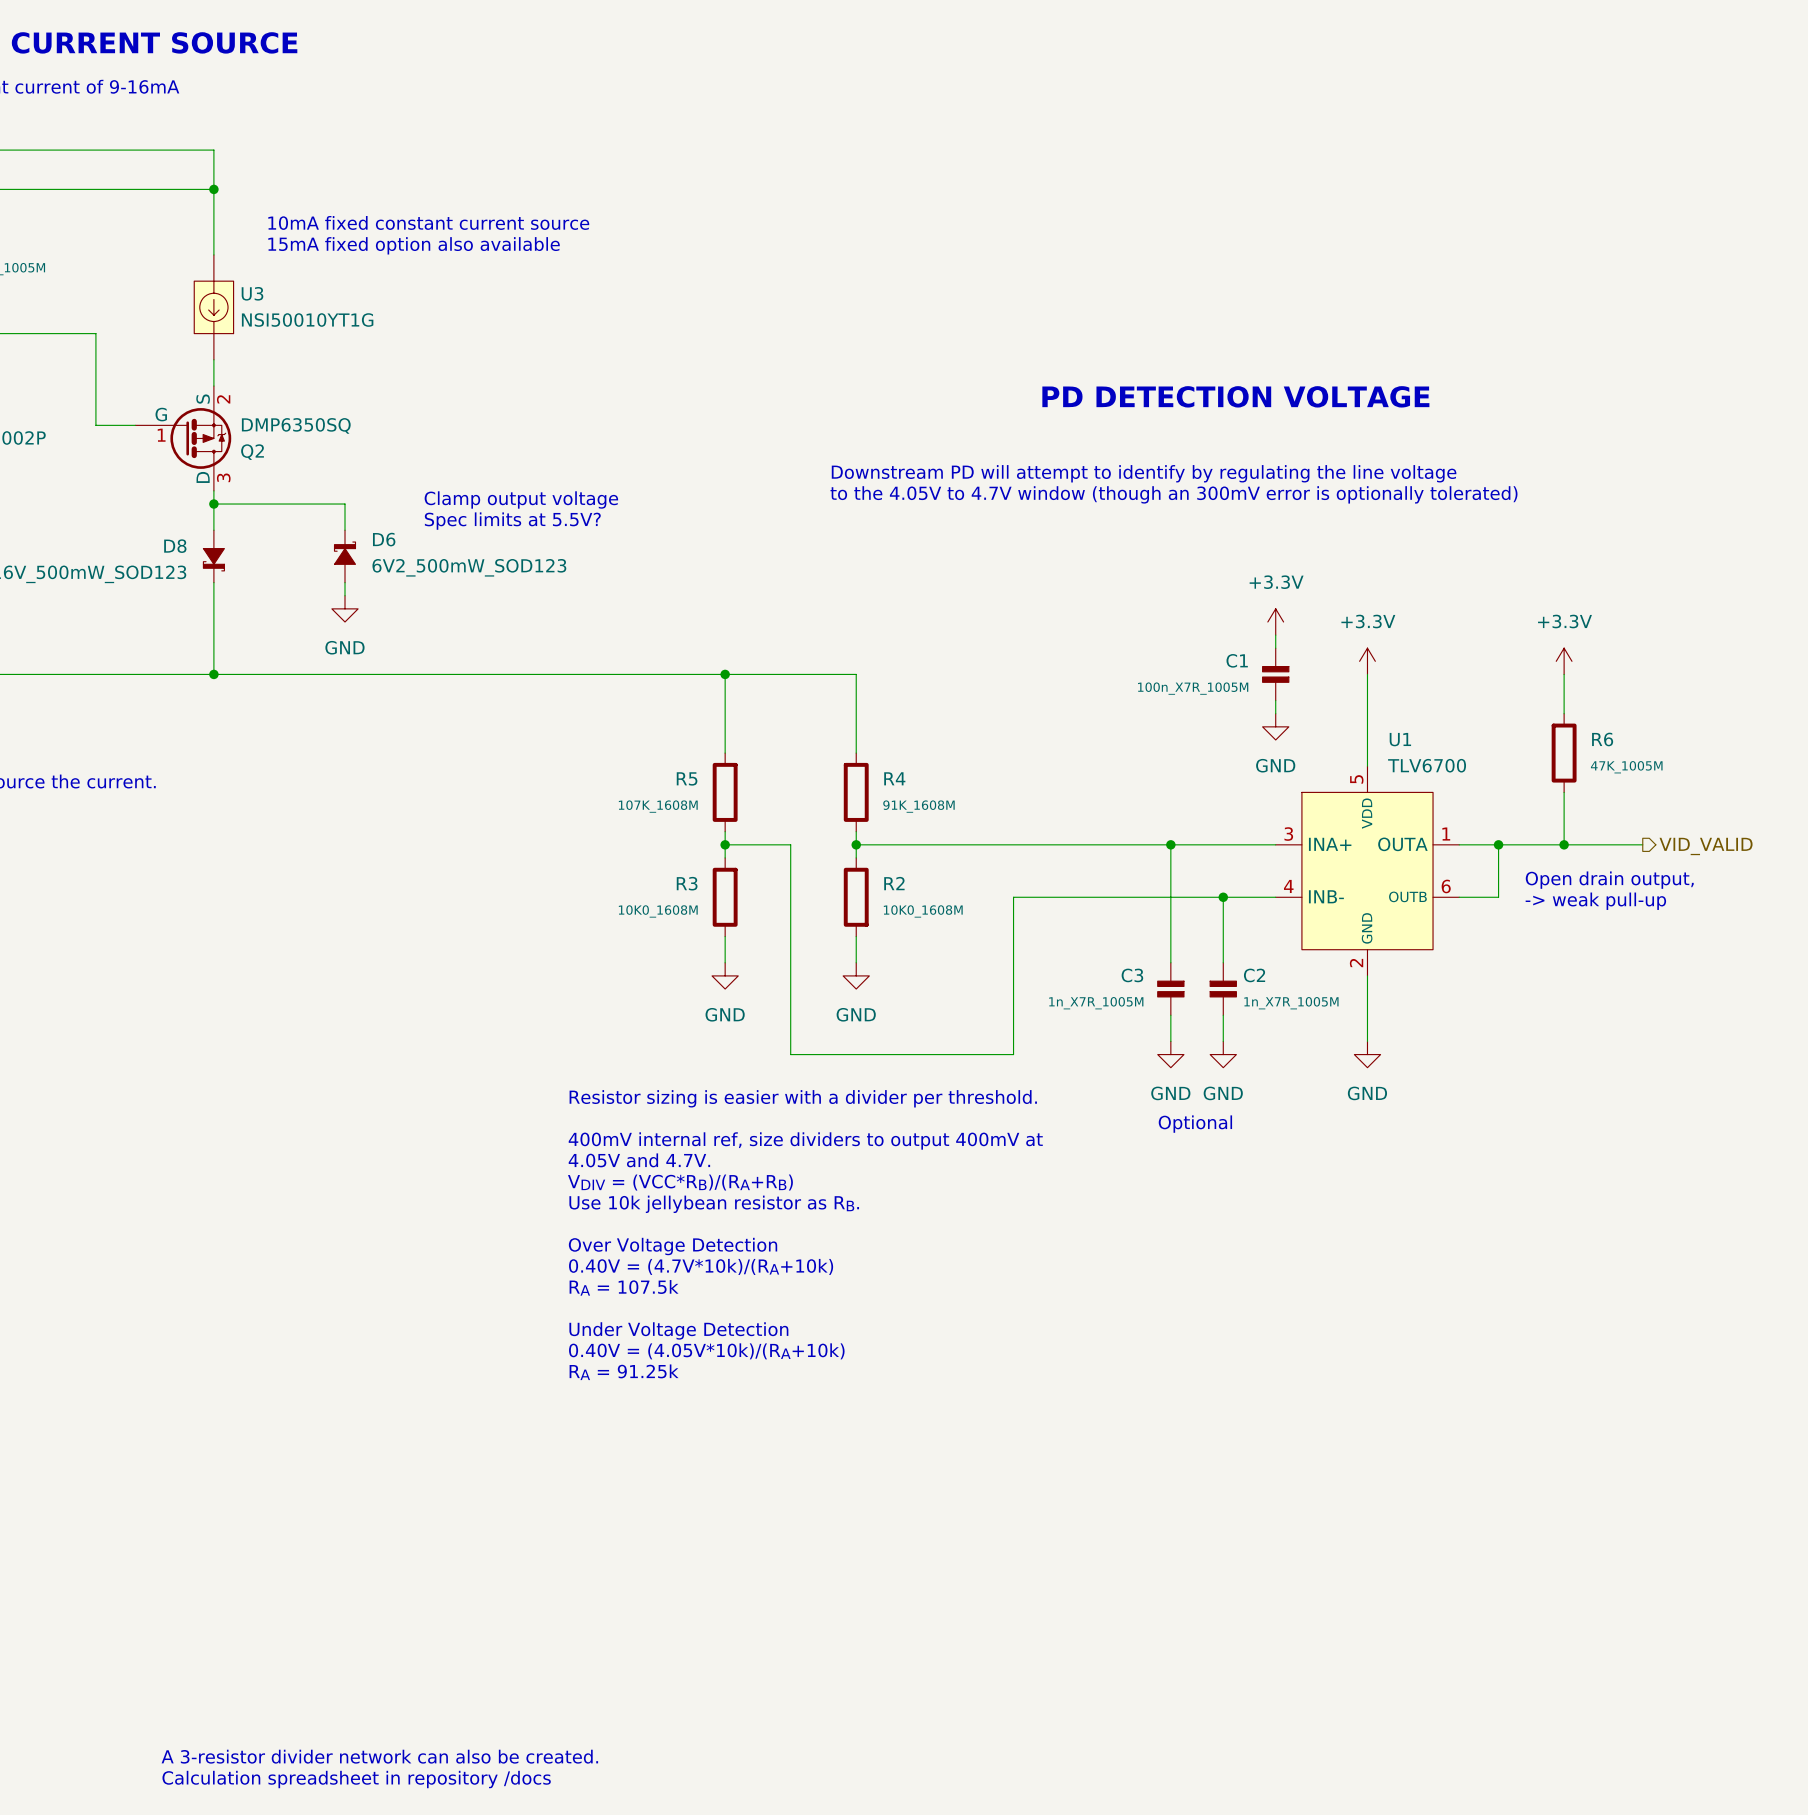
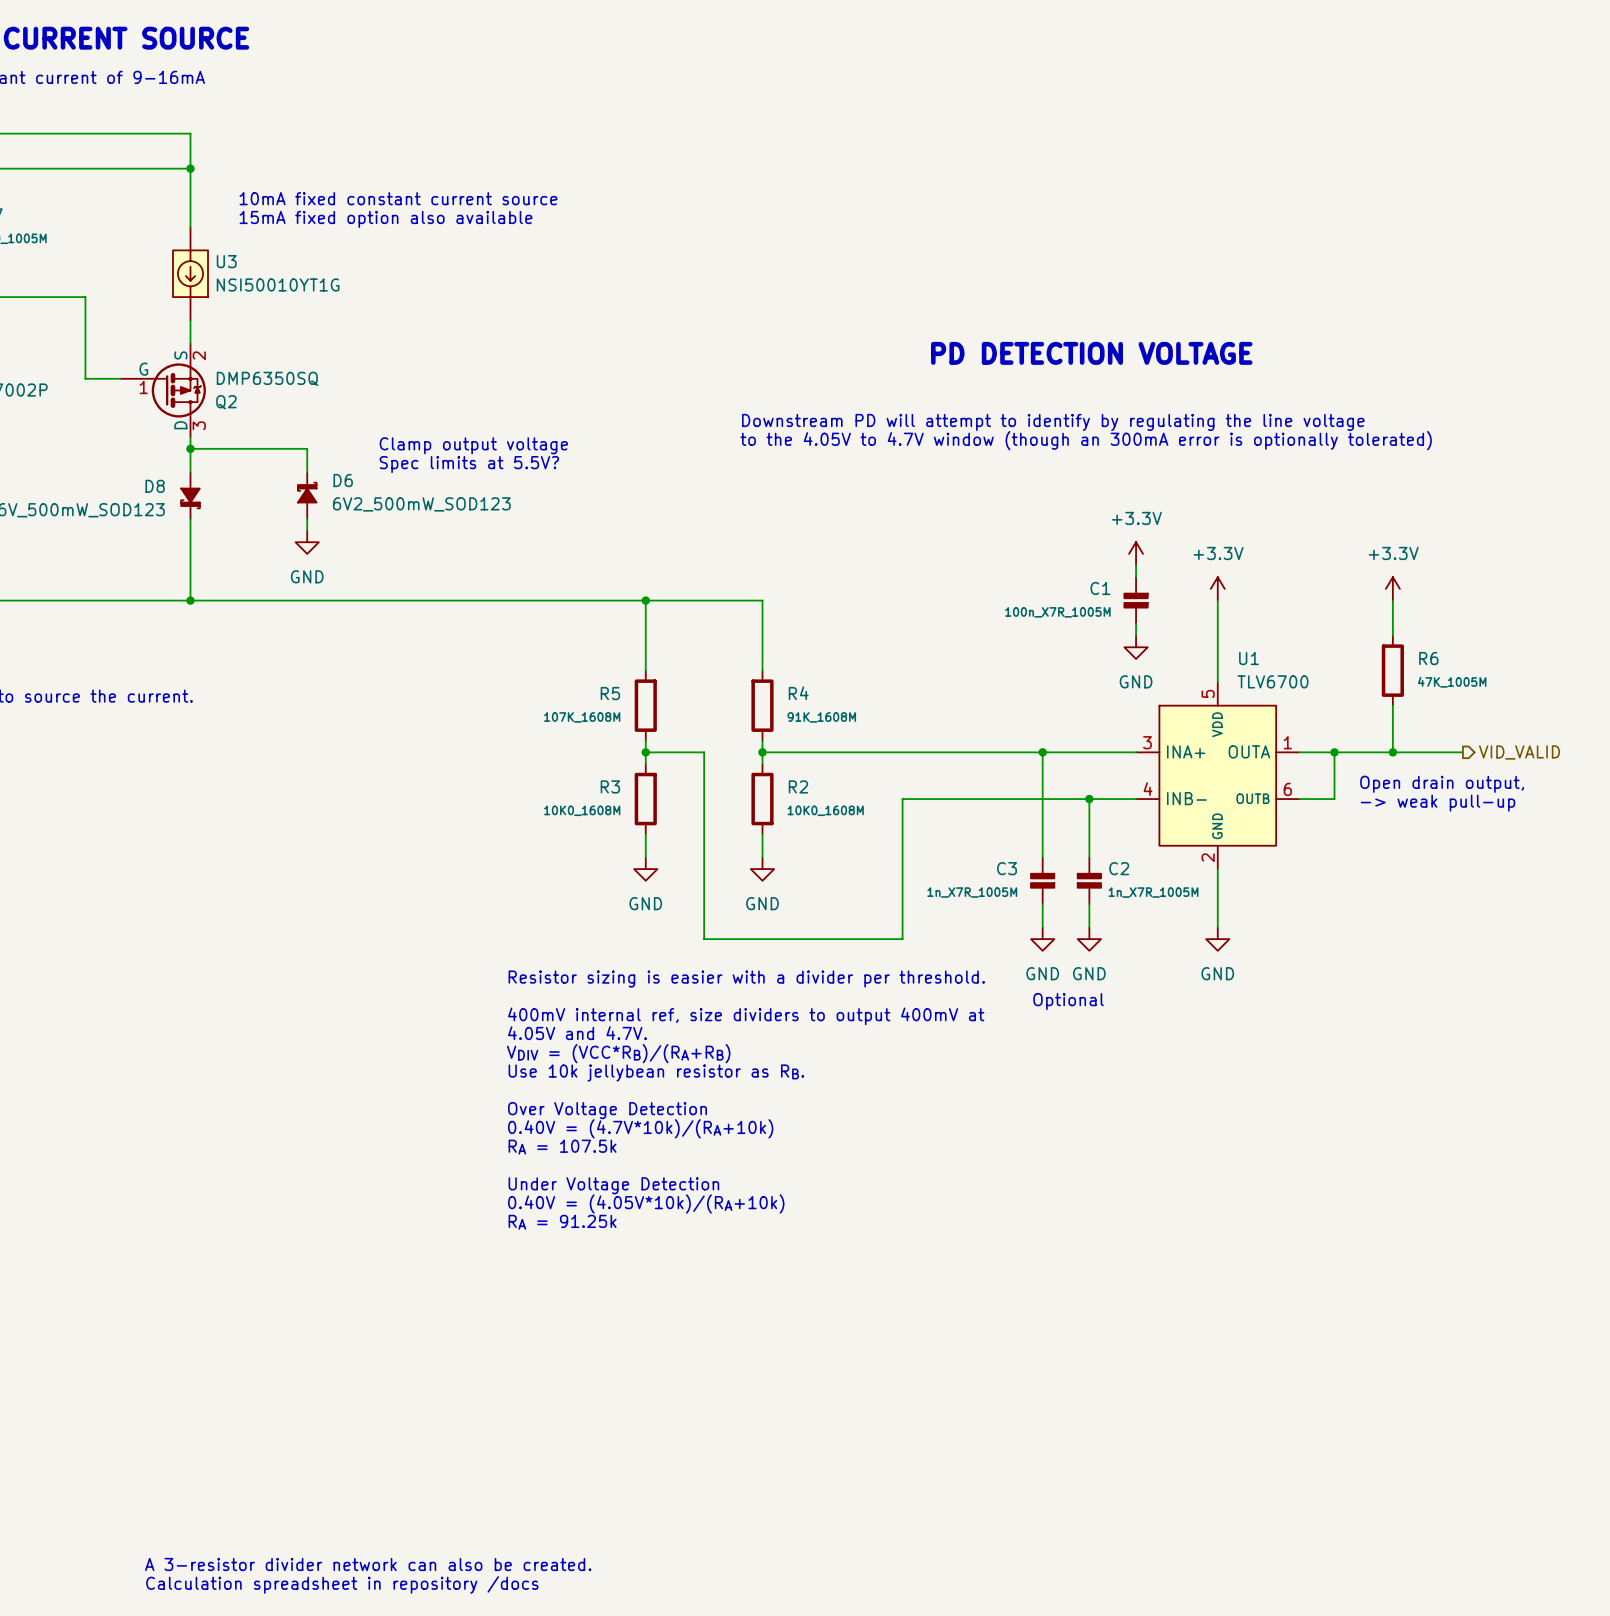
text: to the 4.05V to 4.7V window (though an 300mV error is optionally tolerated) (1174, 494) -> to the 4.05V to 4.7V window (though an 300mA error is optionally tolerated) (1086, 440)

